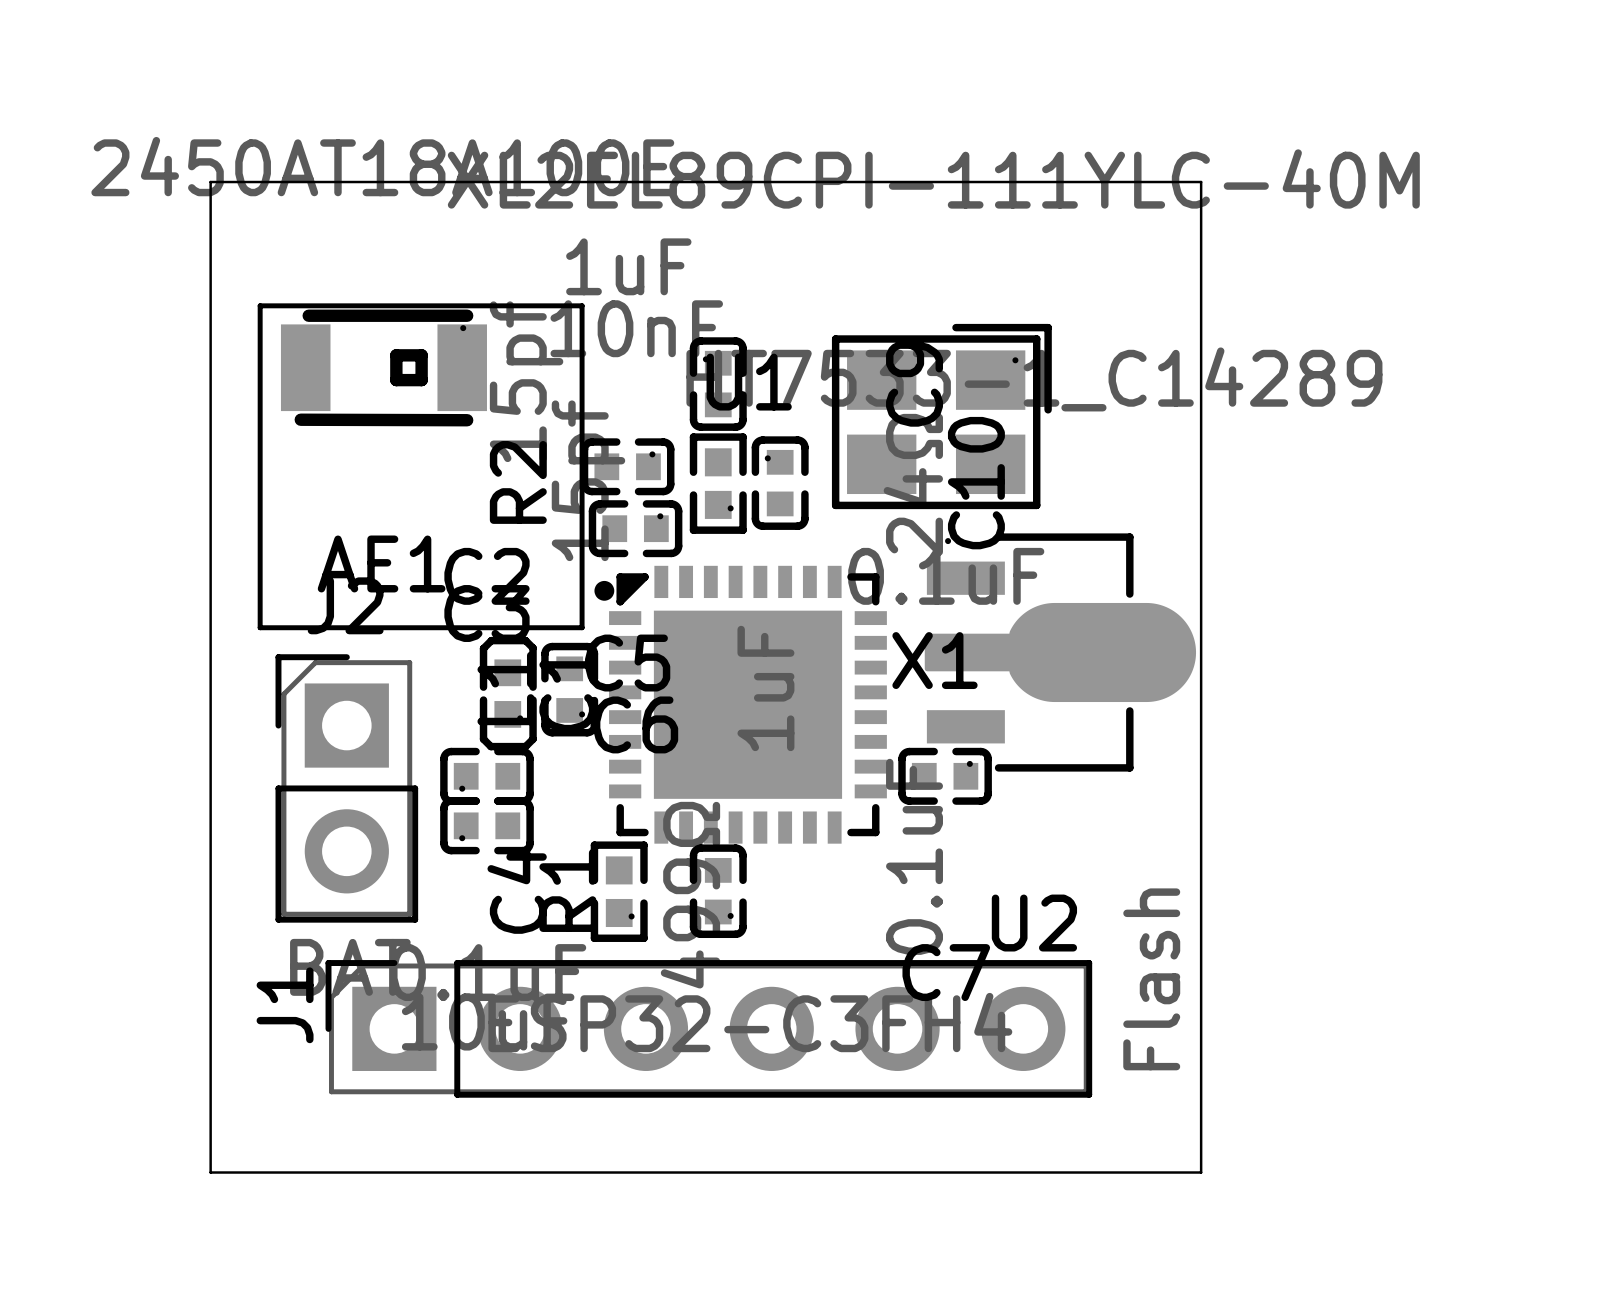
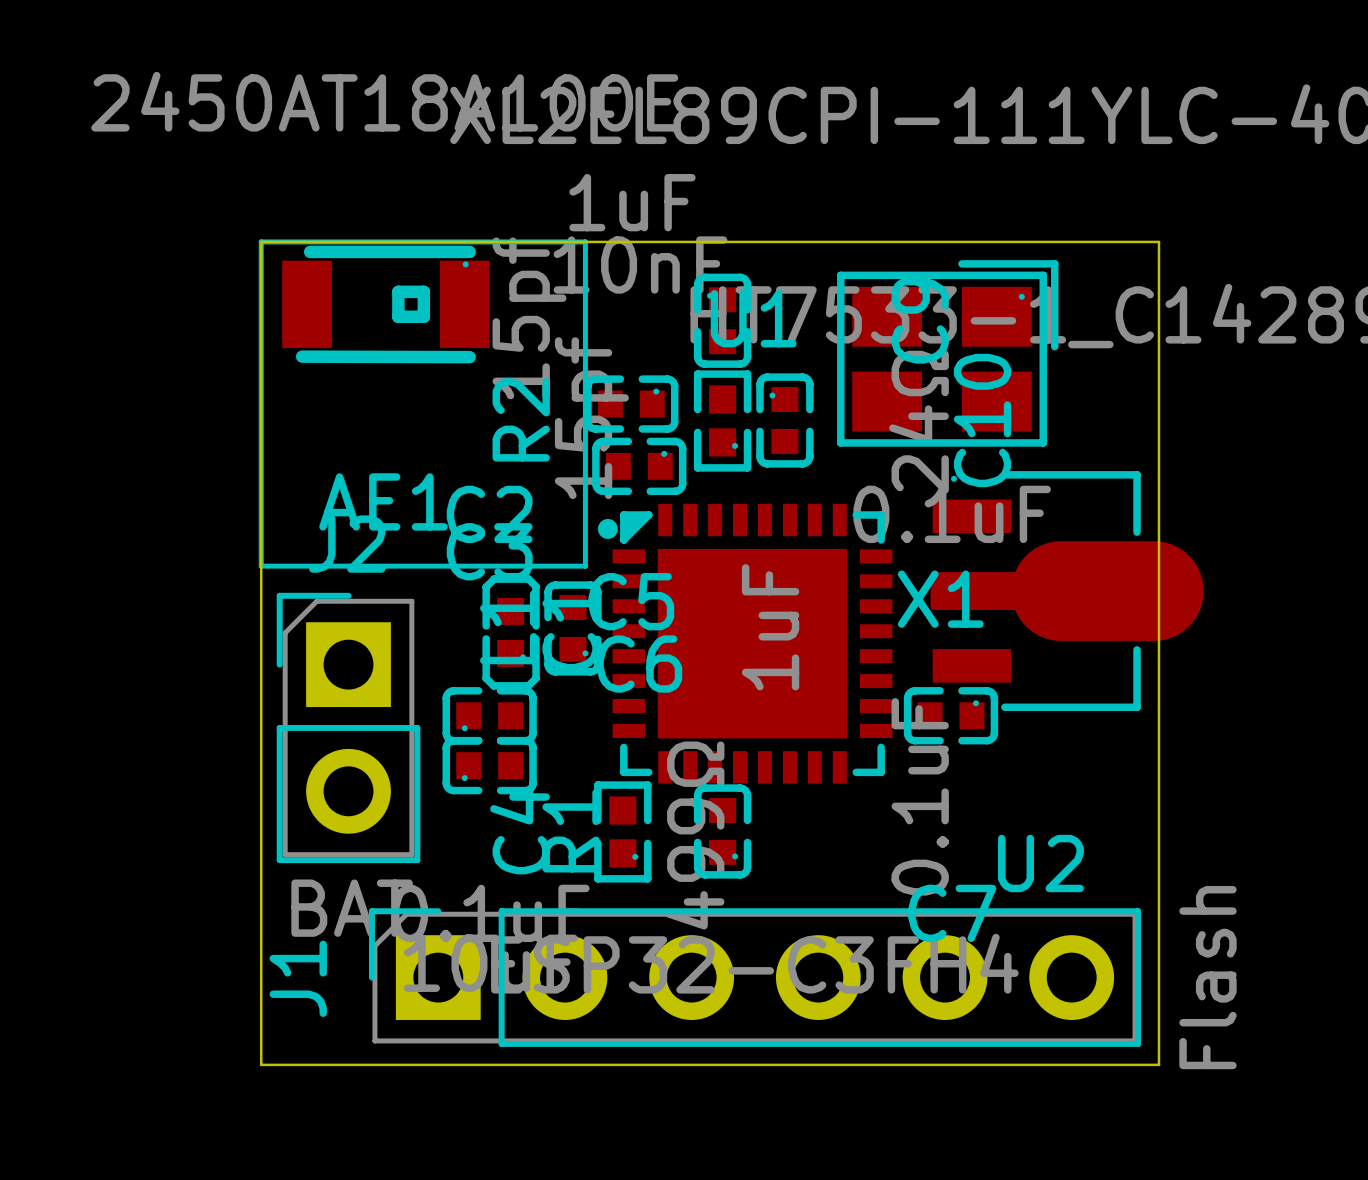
board edge: (210, 182) (1201, 182) (1201, 1172) (210, 1172) (210, 182) -> (261, 241) (261, 1064) (1158, 1064) (1158, 241) (261, 241)
J1 value position: Flash (1151, 979) -> Flash (1207, 977)
J1 name position: J1 (285, 1005) -> J1 (298, 978)
J1 position: (708, 1028) -> (754, 977)

